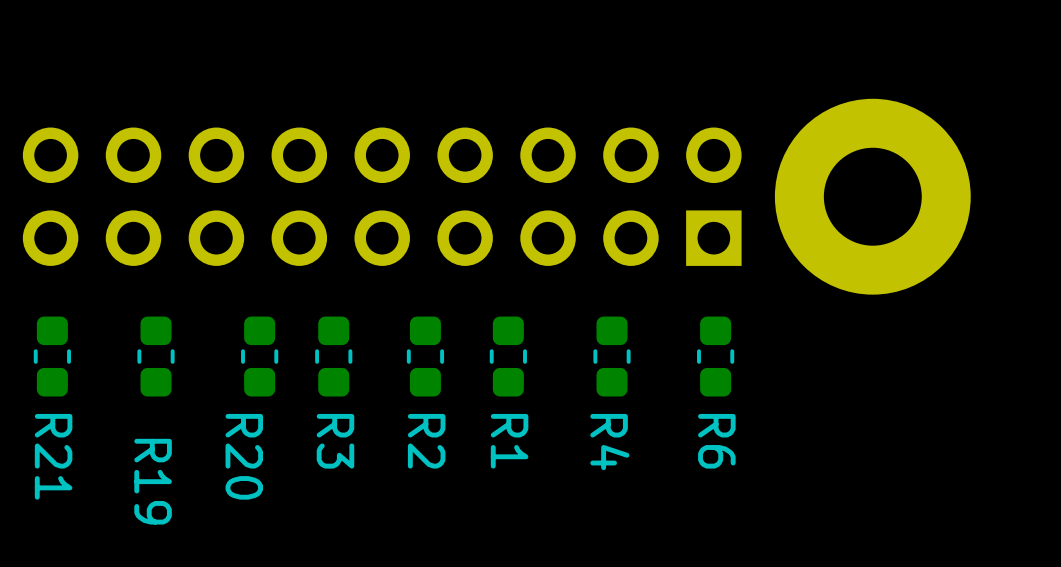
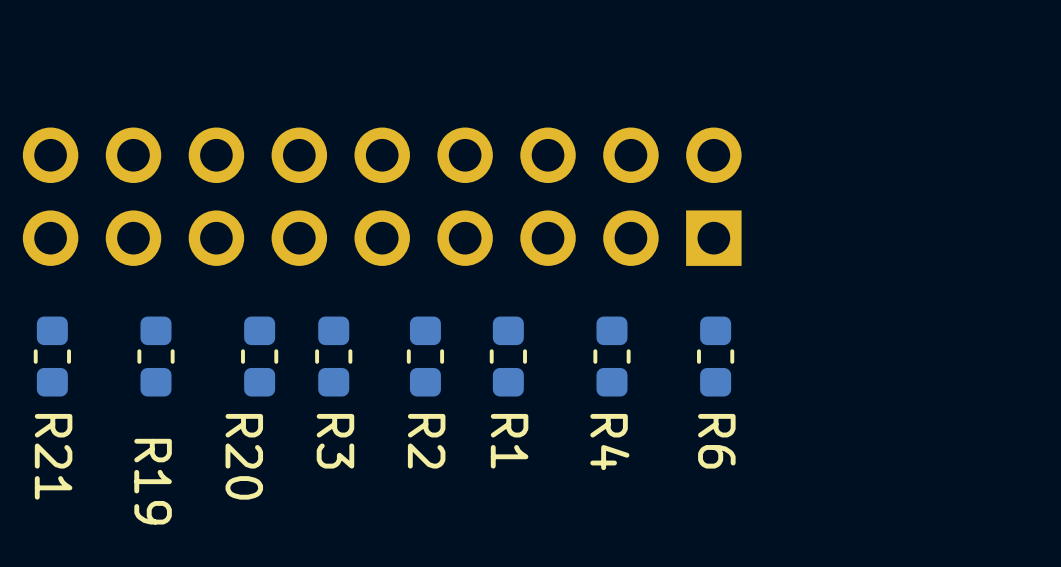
part: (872, 196) -> none

